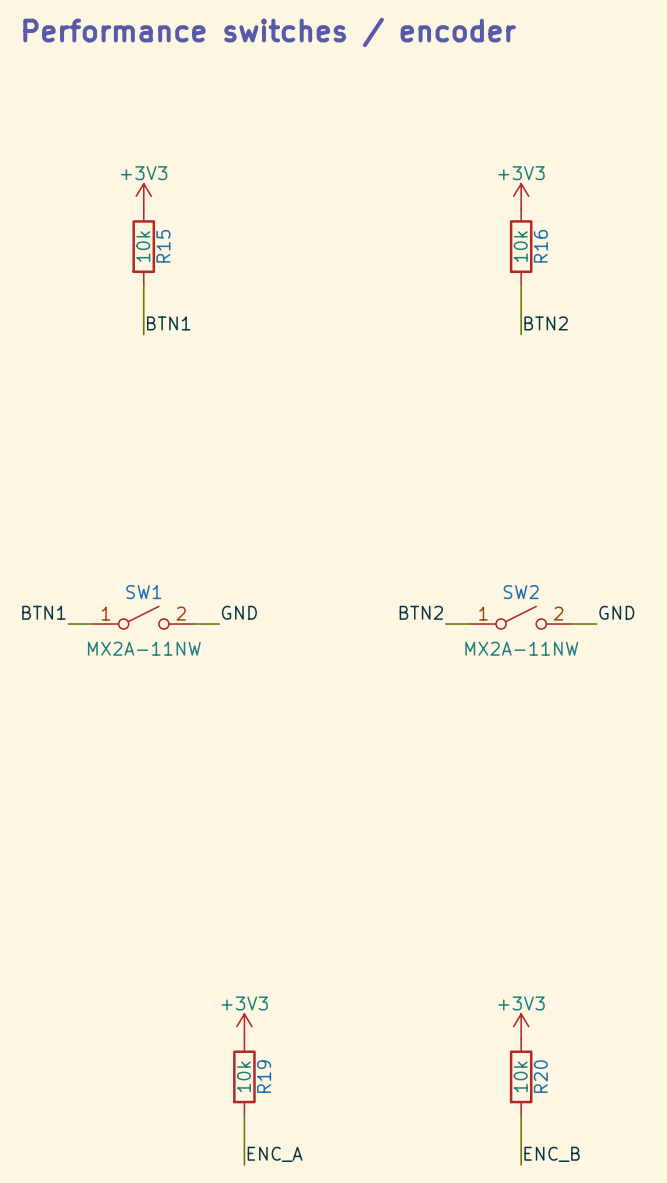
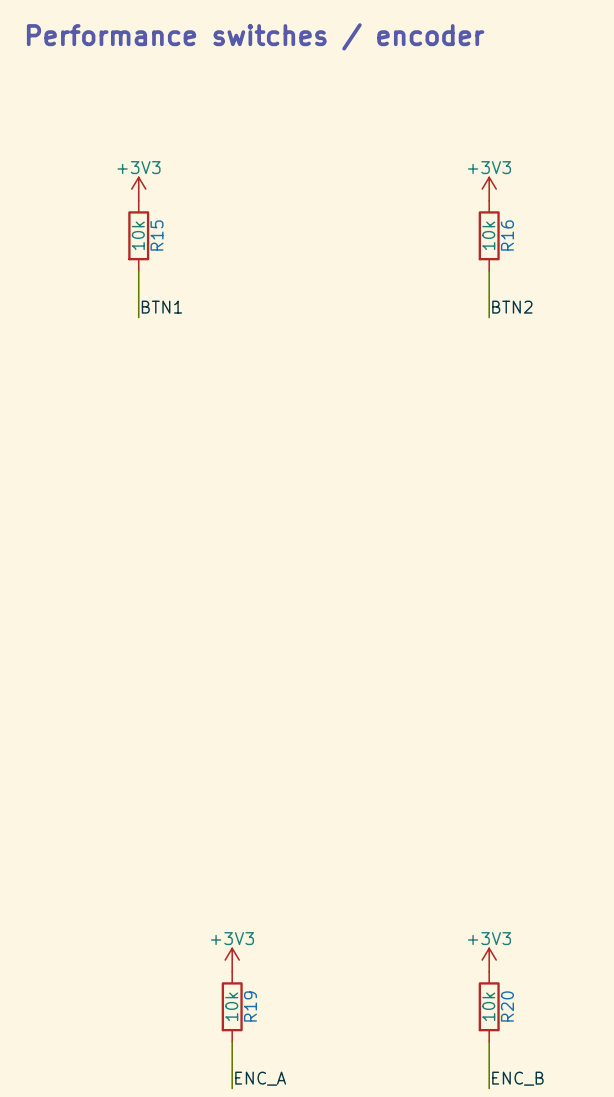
label: BTN1 (43, 612) -> none
label: GND (239, 612) -> none
label: BTN2 (421, 612) -> none
label: GND (616, 612) -> none
SW1: MX2A-11NW (143, 617) -> none
SW2: MX2A-11NW (521, 617) -> none
wire: (68, 624) (93, 624) -> none
wire: (194, 624) (219, 624) -> none
wire: (445, 624) (470, 624) -> none
wire: (571, 624) (596, 624) -> none

